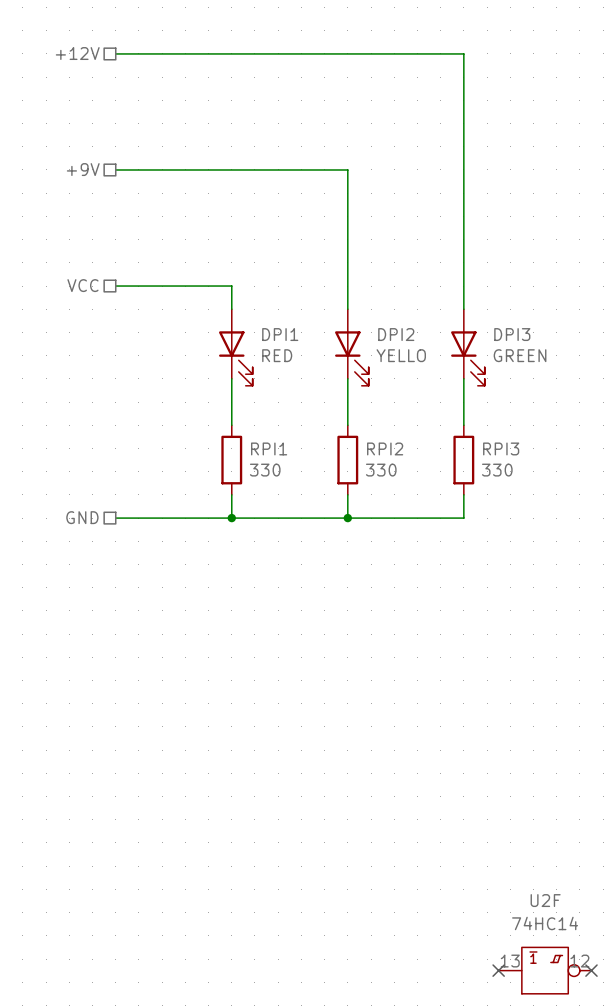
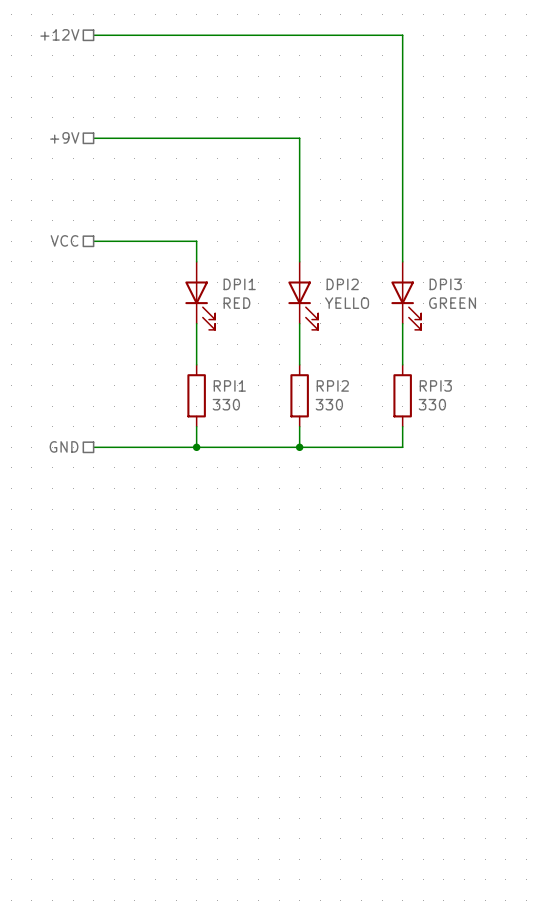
no-connect mark: (498, 970) -> none
U2F: 74HC14 (545, 970) -> none
no-connect mark: (591, 970) -> none

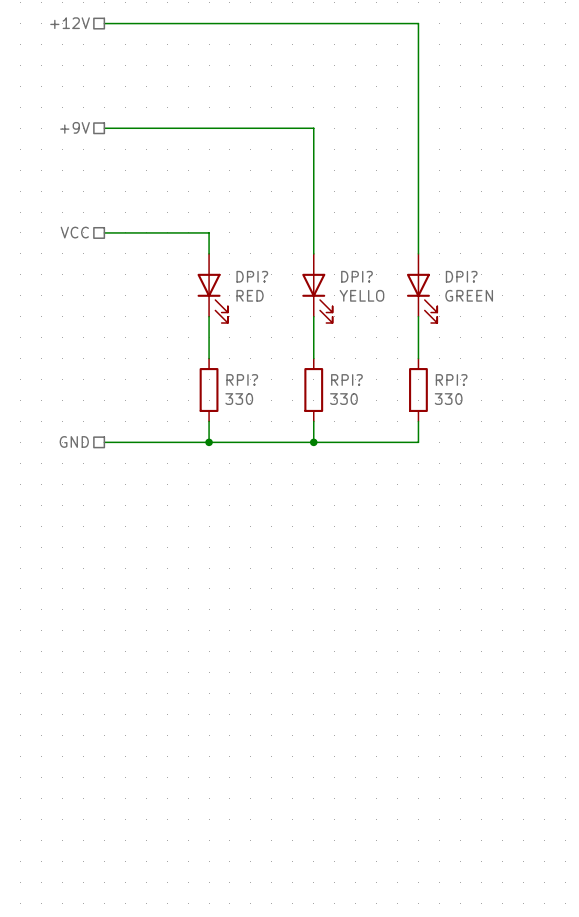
DPI1 name: DPI1 (239, 284) -> DPI? (252, 276)
DPI2 name: DPI2 (342, 284) -> DPI? (356, 276)
DPI3 name: DPI3 (445, 284) -> DPI? (461, 276)
RPI1 name: RPI1 (229, 385) -> RPI? (242, 379)
RPI2 name: RPI2 (332, 385) -> RPI? (346, 379)
RPI3 name: RPI3 (435, 385) -> RPI? (451, 379)

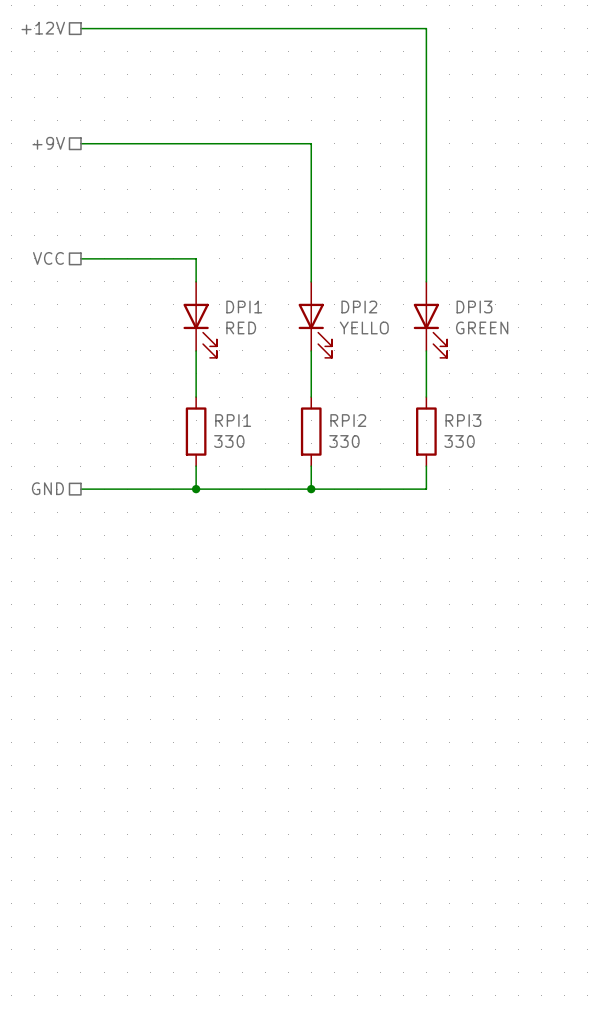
DPI? name: DPI? (252, 276) -> DPI1 (244, 307)
DPI? name: DPI? (356, 276) -> DPI2 (359, 307)
DPI? name: DPI? (461, 276) -> DPI3 (474, 307)
RPI? name: RPI? (242, 379) -> RPI1 (233, 420)
RPI? name: RPI? (346, 379) -> RPI2 (348, 420)
RPI? name: RPI? (451, 379) -> RPI3 (463, 420)

